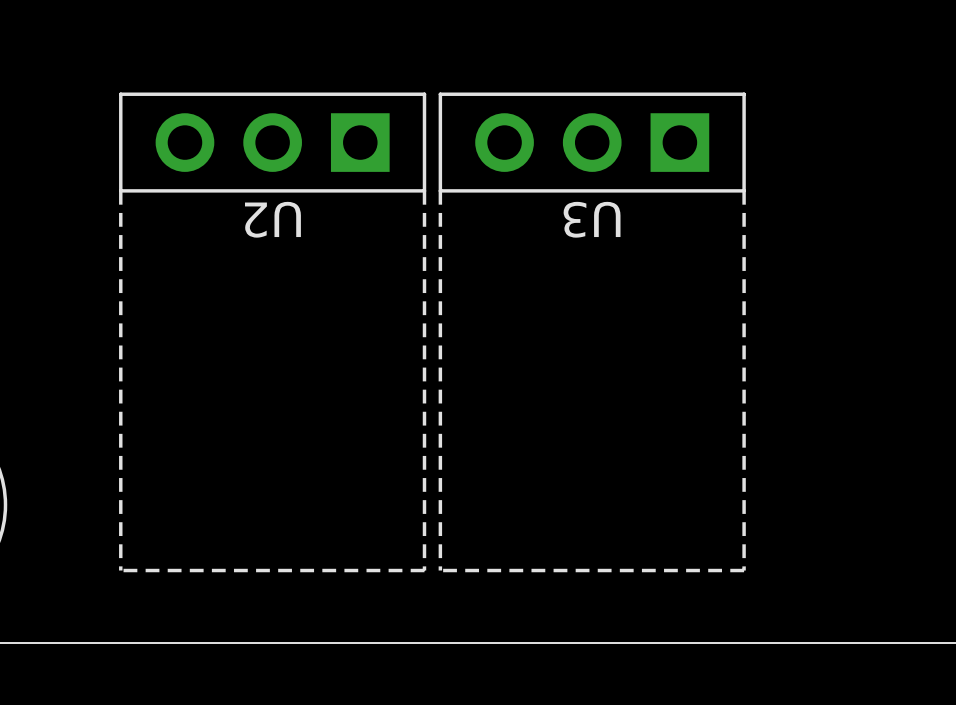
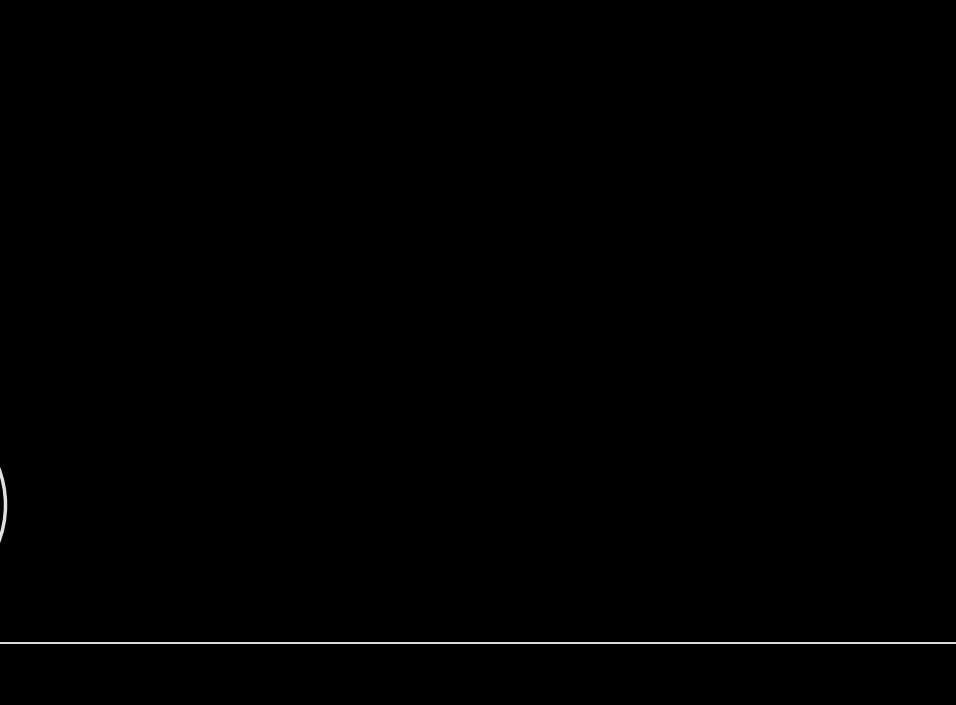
U2: (272, 332) -> none
U3: (592, 332) -> none

